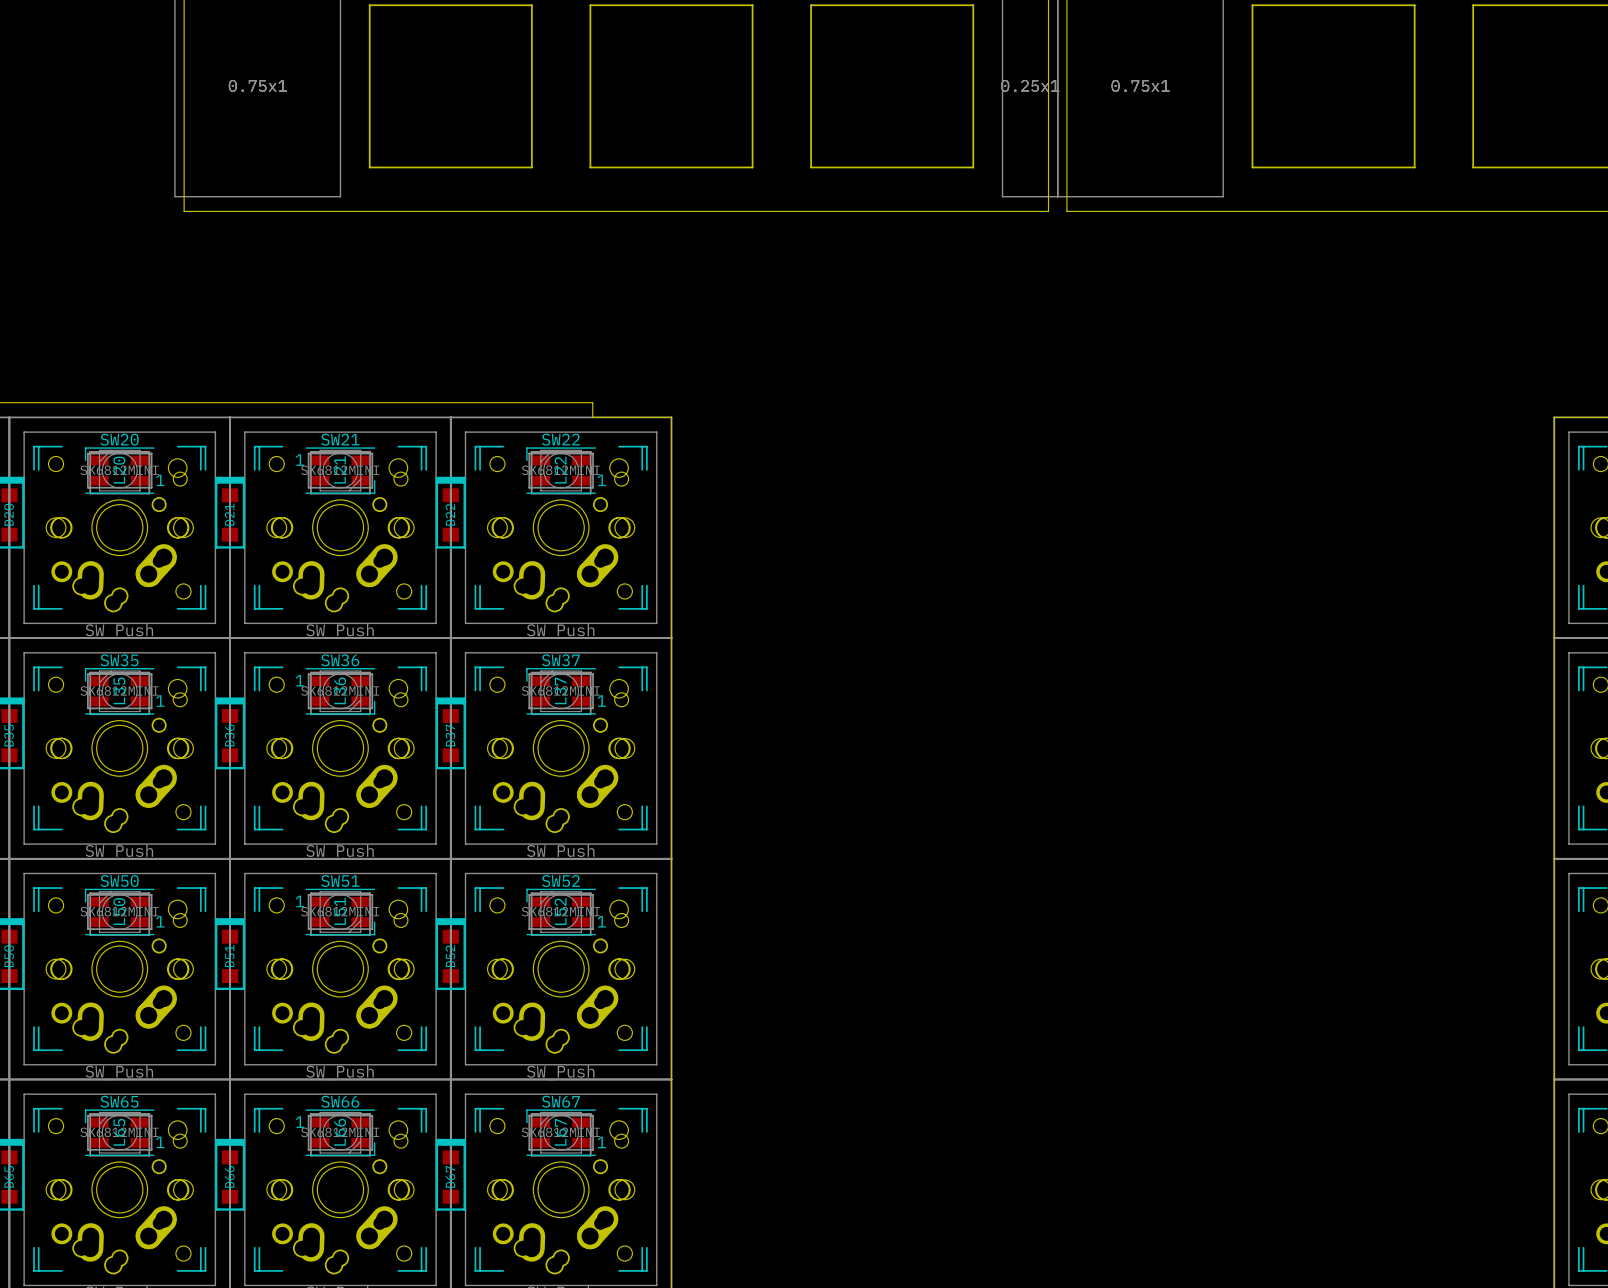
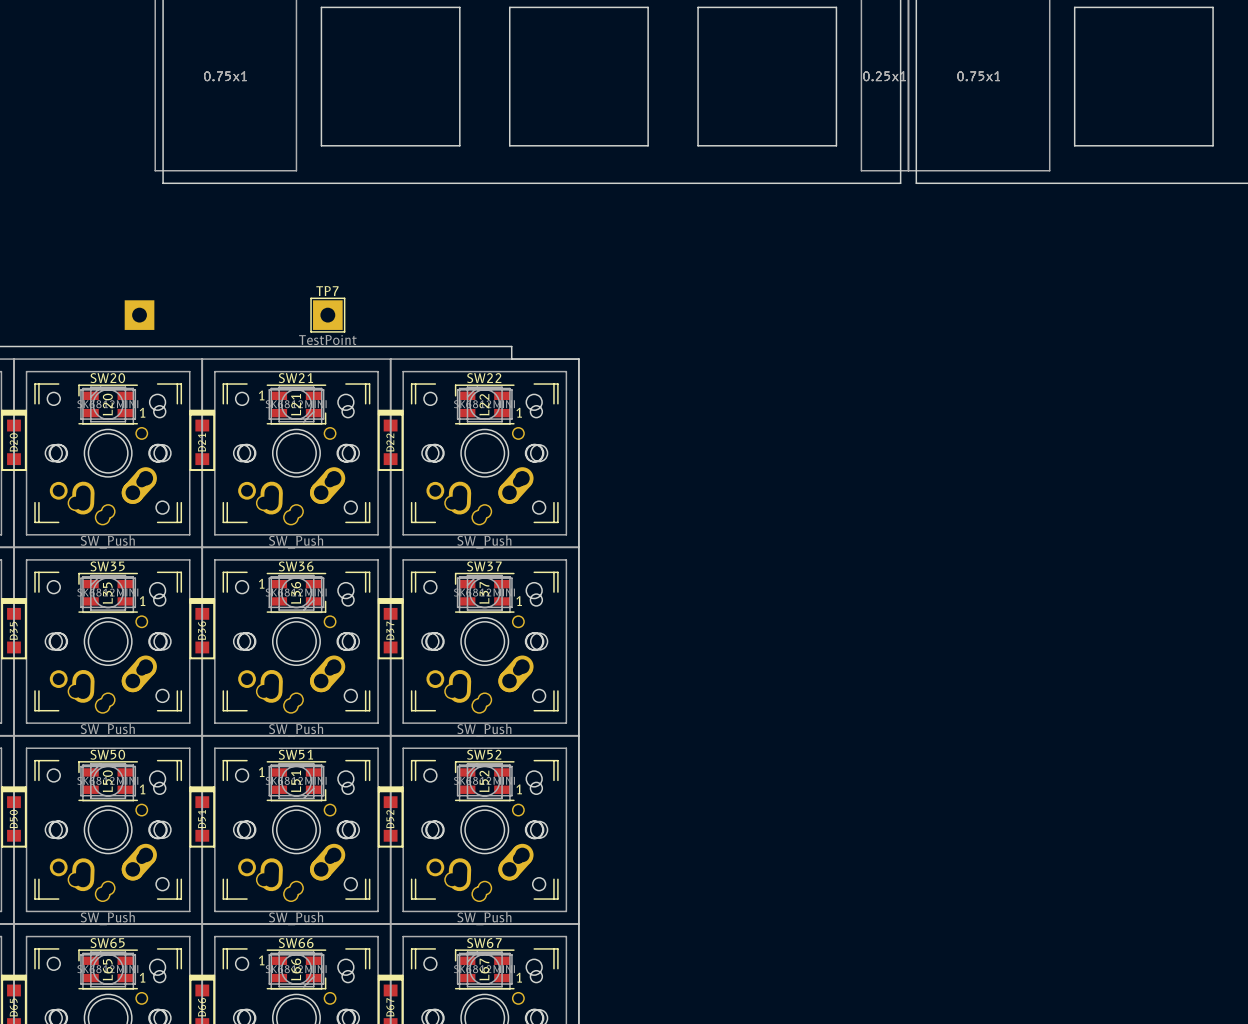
part: none -> (139, 315)
TP7: none -> TestPoint (327, 315)

